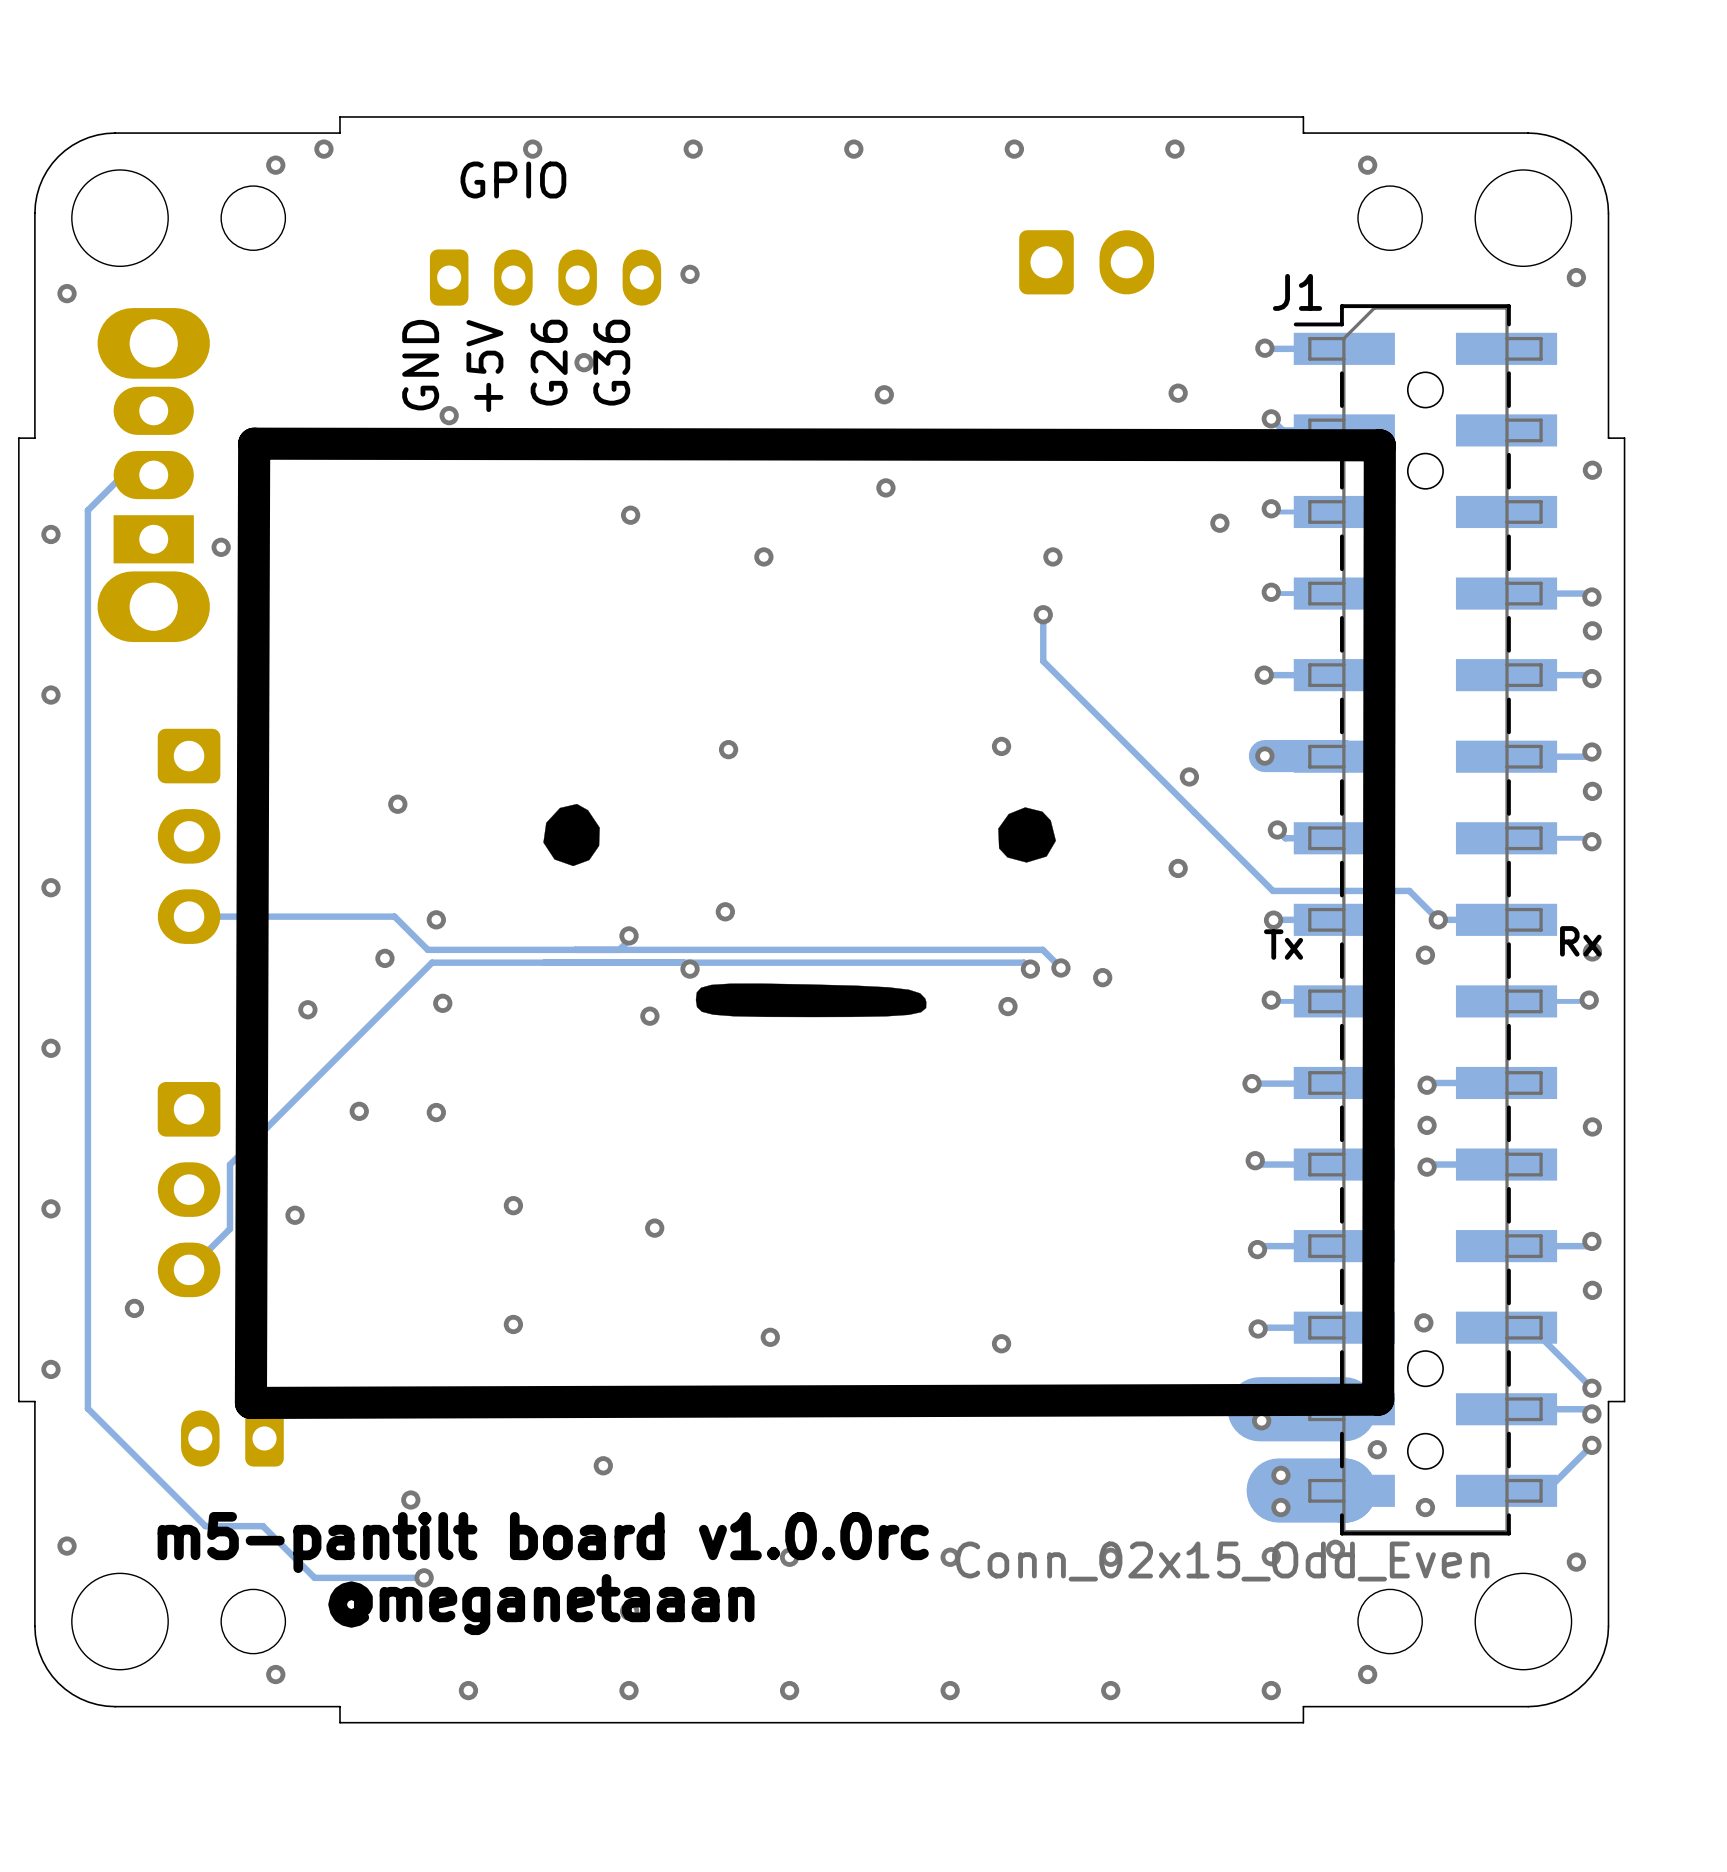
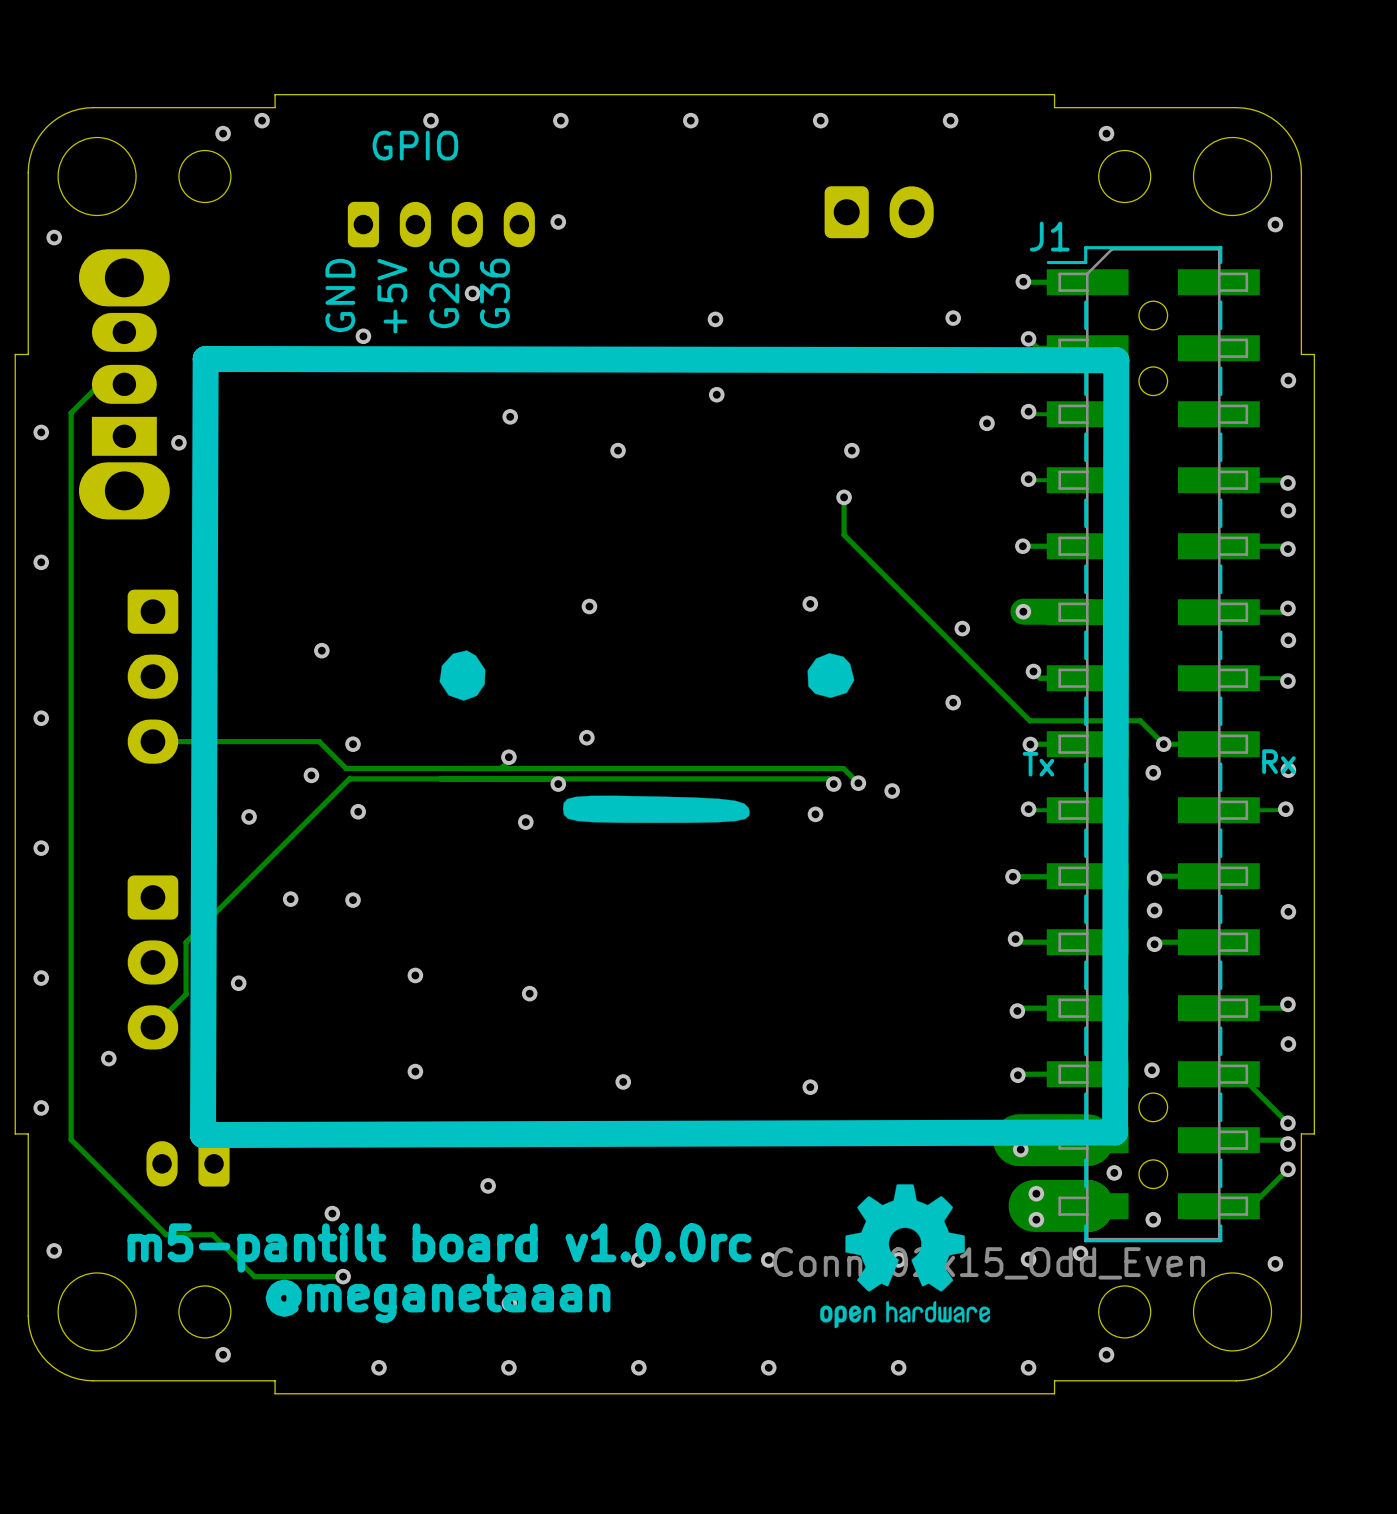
drawing: none -> [820, 1184, 991, 1329]

